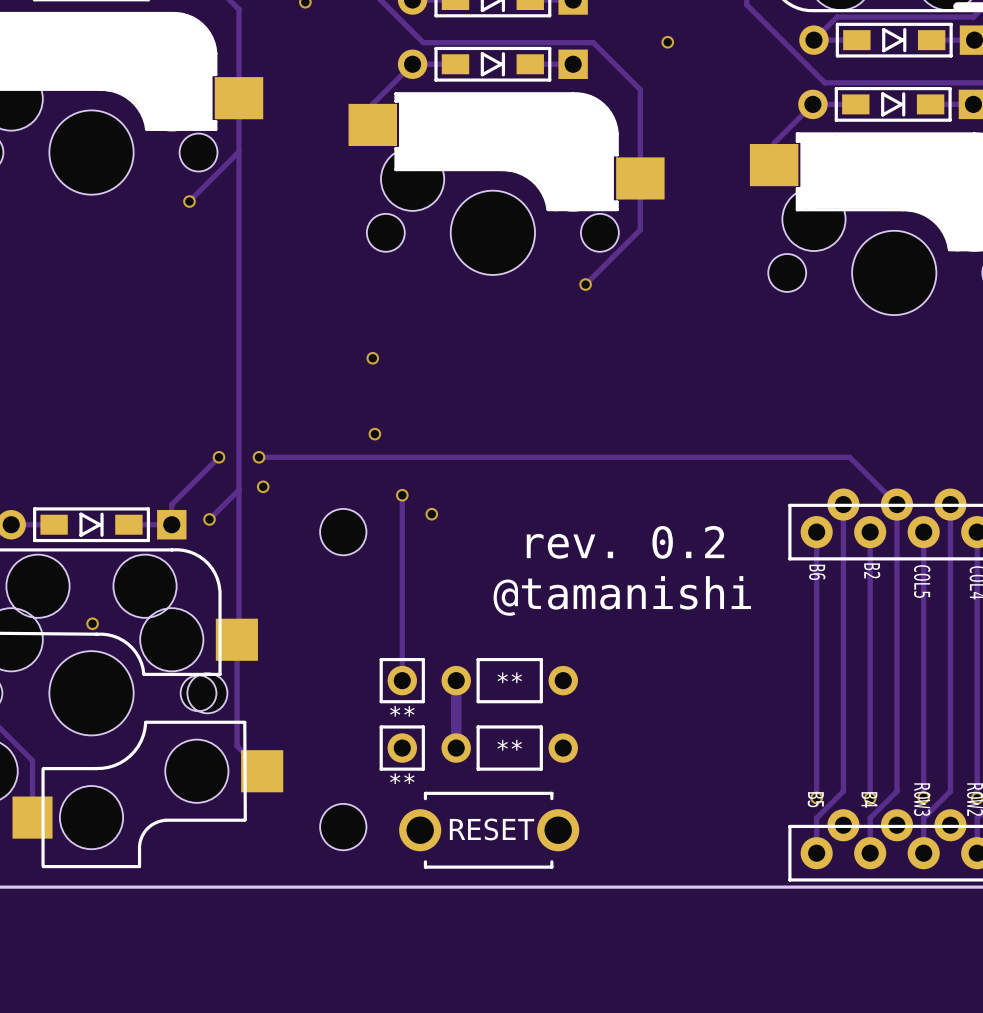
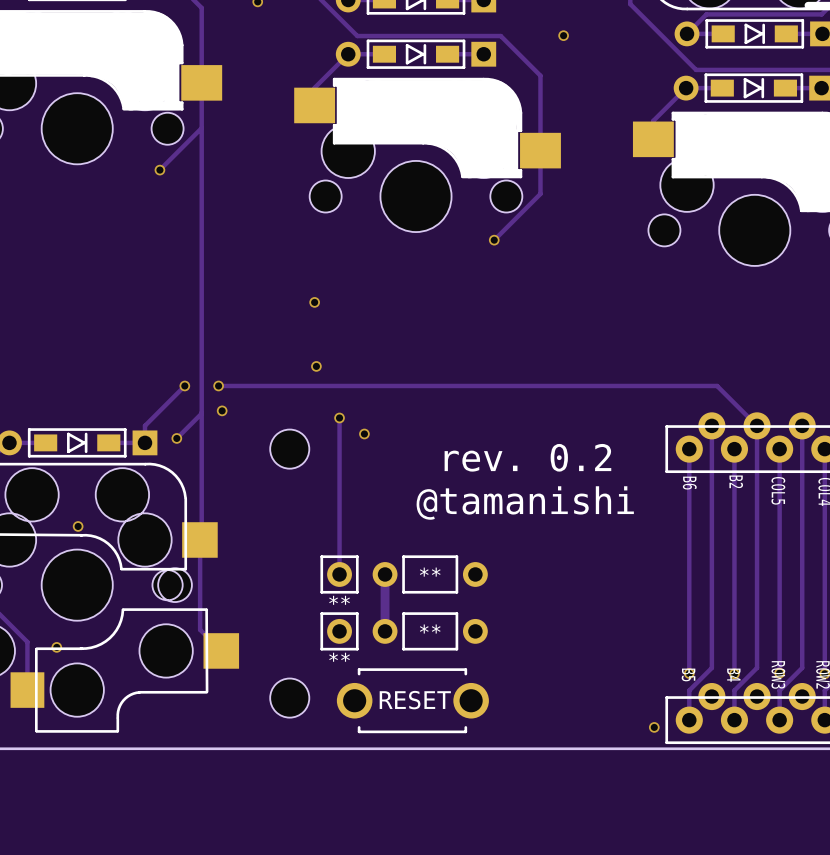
via: none -> (56, 647)
via: none -> (654, 727)

